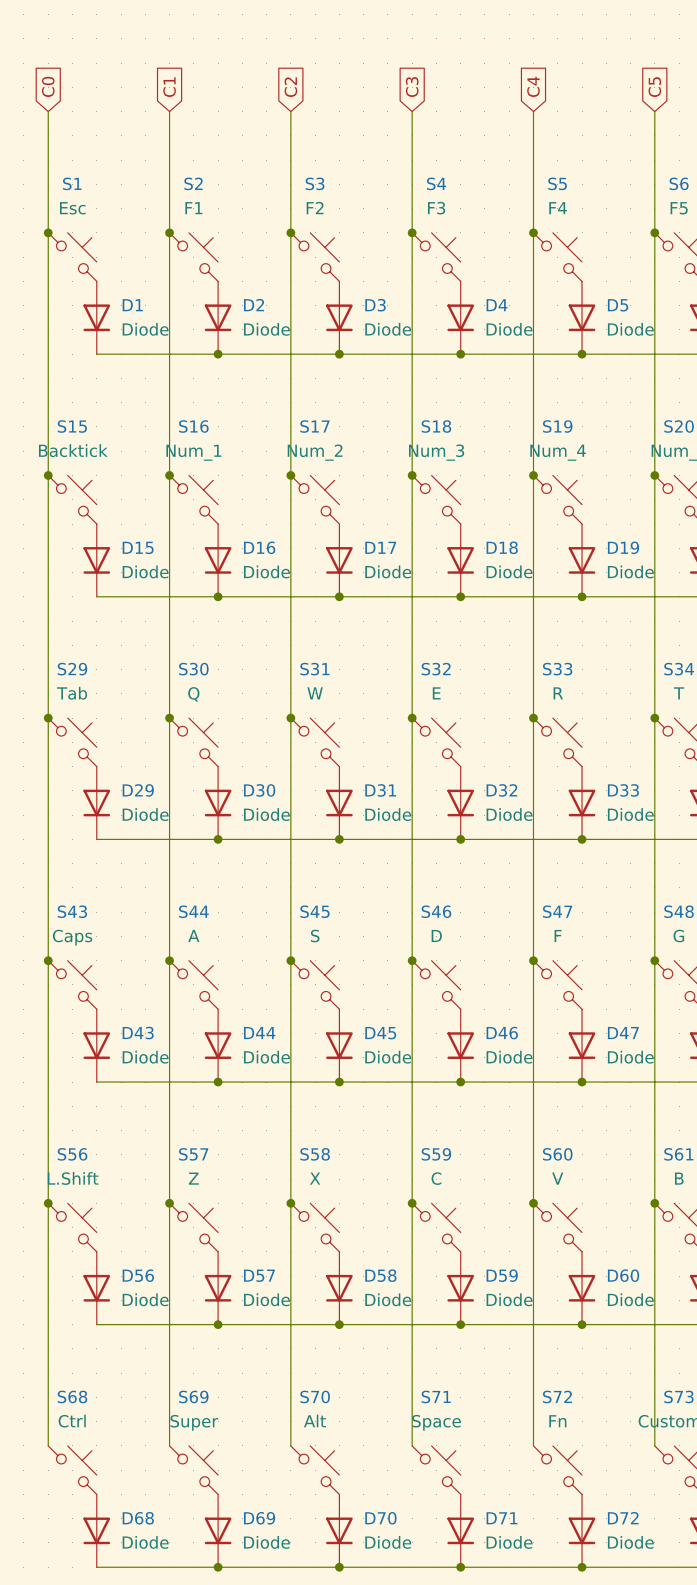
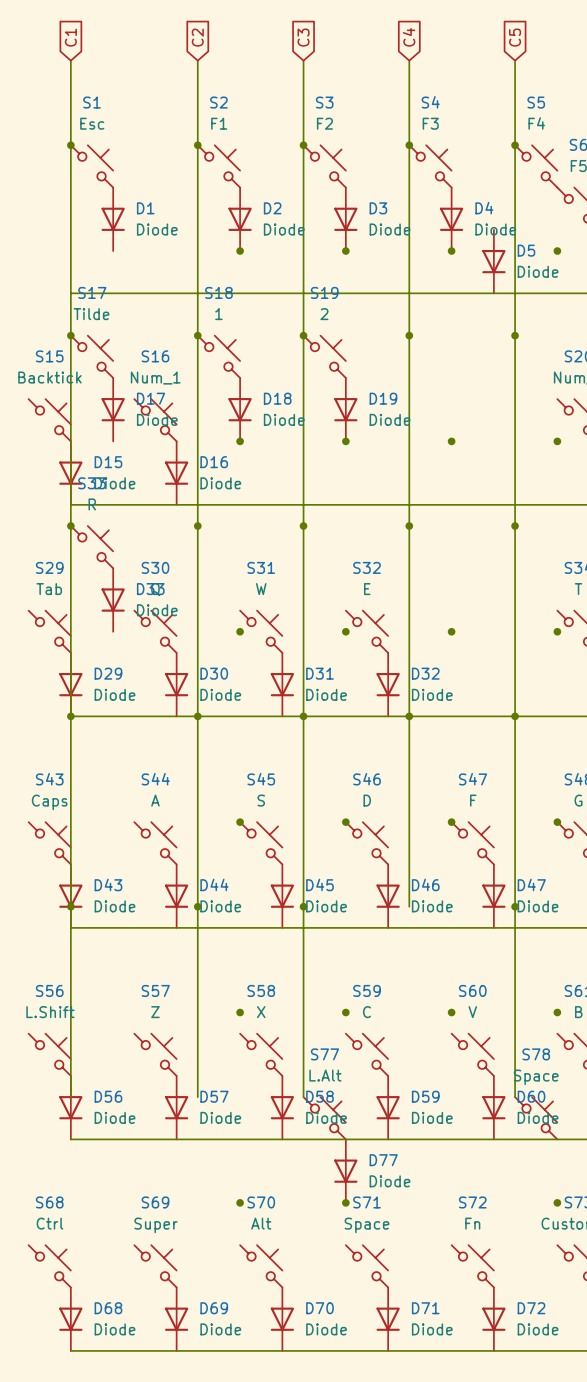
global label: C0 (48, 86) -> none
global label position: C4 (533, 86) -> C4 (409, 37)
wire: none -> (70, 60) (70, 1097)
global label position: C1 (169, 87) -> C1 (70, 37)
wire: none -> (197, 60) (197, 1097)
global label position: C2 (290, 87) -> C2 (197, 37)
wire: none -> (303, 60) (303, 1097)
global label position: C3 (412, 87) -> C3 (303, 37)
wire: none -> (409, 60) (409, 906)
wire: none -> (515, 60) (515, 1097)
global label position: C5 (654, 87) -> C5 (515, 37)
wire: (48, 111) (48, 1445) -> none
wire: (169, 111) (169, 1445) -> none
wire: (290, 111) (290, 1445) -> none
wire: (412, 111) (412, 1445) -> none
wire: (533, 111) (533, 1445) -> none
wire: (654, 111) (654, 1445) -> none
junction: none -> (70, 145)
junction: none -> (197, 145)
junction: none -> (303, 145)
junction: none -> (409, 145)
junction: none -> (515, 145)
junction: (48, 232) -> none
junction: (169, 232) -> none
junction: (290, 232) -> none
junction: (412, 232) -> none
junction: (533, 232) -> none
junction: (654, 232) -> none
S1 position: (72, 257) -> (92, 166)
S2 position: (193, 257) -> (218, 166)
S3 position: (315, 257) -> (324, 166)
S4 position: (436, 257) -> (430, 166)
S5 position: (557, 257) -> (536, 166)
junction: none -> (240, 251)
junction: none -> (345, 251)
junction: none -> (451, 251)
junction: none -> (557, 251)
D1 position: (96, 317) -> (113, 219)
D2 position: (218, 317) -> (240, 219)
D3 position: (339, 317) -> (345, 219)
D4 position: (460, 317) -> (451, 219)
junction: (218, 354) -> none
junction: (339, 354) -> none
junction: (460, 354) -> none
junction: (582, 354) -> none
junction: none -> (70, 335)
junction: none -> (197, 335)
junction: none -> (303, 335)
junction: none -> (409, 335)
junction: none -> (515, 335)
S17 value: Num_2 (315, 452) -> Tilde (91, 314)
S18 value: Num_3 (436, 452) -> 1 (218, 314)
S19 value: Num_4 (558, 452) -> 2 (324, 314)
junction: (48, 475) -> none
junction: (169, 475) -> none
junction: (290, 475) -> none
junction: (412, 475) -> none
junction: (533, 475) -> none
junction: (654, 475) -> none
S17 position: (315, 499) -> (92, 356)
S18 position: (436, 499) -> (218, 356)
S19 position: (557, 499) -> (324, 356)
junction: none -> (240, 441)
junction: none -> (345, 441)
junction: none -> (451, 441)
junction: none -> (557, 441)
D17 position: (339, 560) -> (113, 409)
D18 position: (460, 560) -> (240, 409)
D19 position: (582, 560) -> (345, 409)
junction position: (218, 596) -> (197, 526)
junction position: (339, 596) -> (303, 526)
junction position: (460, 596) -> (409, 526)
junction position: (582, 596) -> (515, 526)
junction: none -> (70, 526)
junction: (48, 718) -> none
junction: (169, 718) -> none
junction position: (290, 718) -> (240, 631)
junction position: (412, 718) -> (345, 631)
junction position: (533, 718) -> (451, 631)
junction position: (654, 718) -> (557, 631)
S33 position: (557, 742) -> (92, 547)
D33 position: (582, 803) -> (113, 600)
junction: none -> (70, 716)
junction position: (218, 839) -> (197, 716)
junction position: (339, 839) -> (303, 716)
junction position: (460, 839) -> (409, 716)
junction position: (582, 839) -> (515, 716)
junction: (48, 960) -> none
junction: (169, 960) -> none
junction: none -> (70, 906)
junction position: (218, 1082) -> (197, 906)
junction position: (339, 1082) -> (303, 906)
junction: (460, 1082) -> none
junction position: (582, 1082) -> (515, 906)
junction: (48, 1203) -> none
junction: (169, 1203) -> none
junction position: (290, 1203) -> (240, 1012)
junction position: (412, 1203) -> (345, 1012)
junction position: (533, 1203) -> (451, 1012)
junction position: (654, 1203) -> (557, 1012)
S77: none -> L.Alt (324, 1118)
S78: none -> Space (536, 1118)
junction: (218, 1324) -> none
junction: (339, 1324) -> none
junction: (460, 1324) -> none
junction: (582, 1324) -> none
D77: none -> Diode (345, 1171)
junction: none -> (240, 1202)
junction: none -> (345, 1202)
junction: none -> (557, 1202)
junction: (218, 1567) -> none
junction: (339, 1567) -> none
junction: (460, 1567) -> none
junction: (582, 1567) -> none

